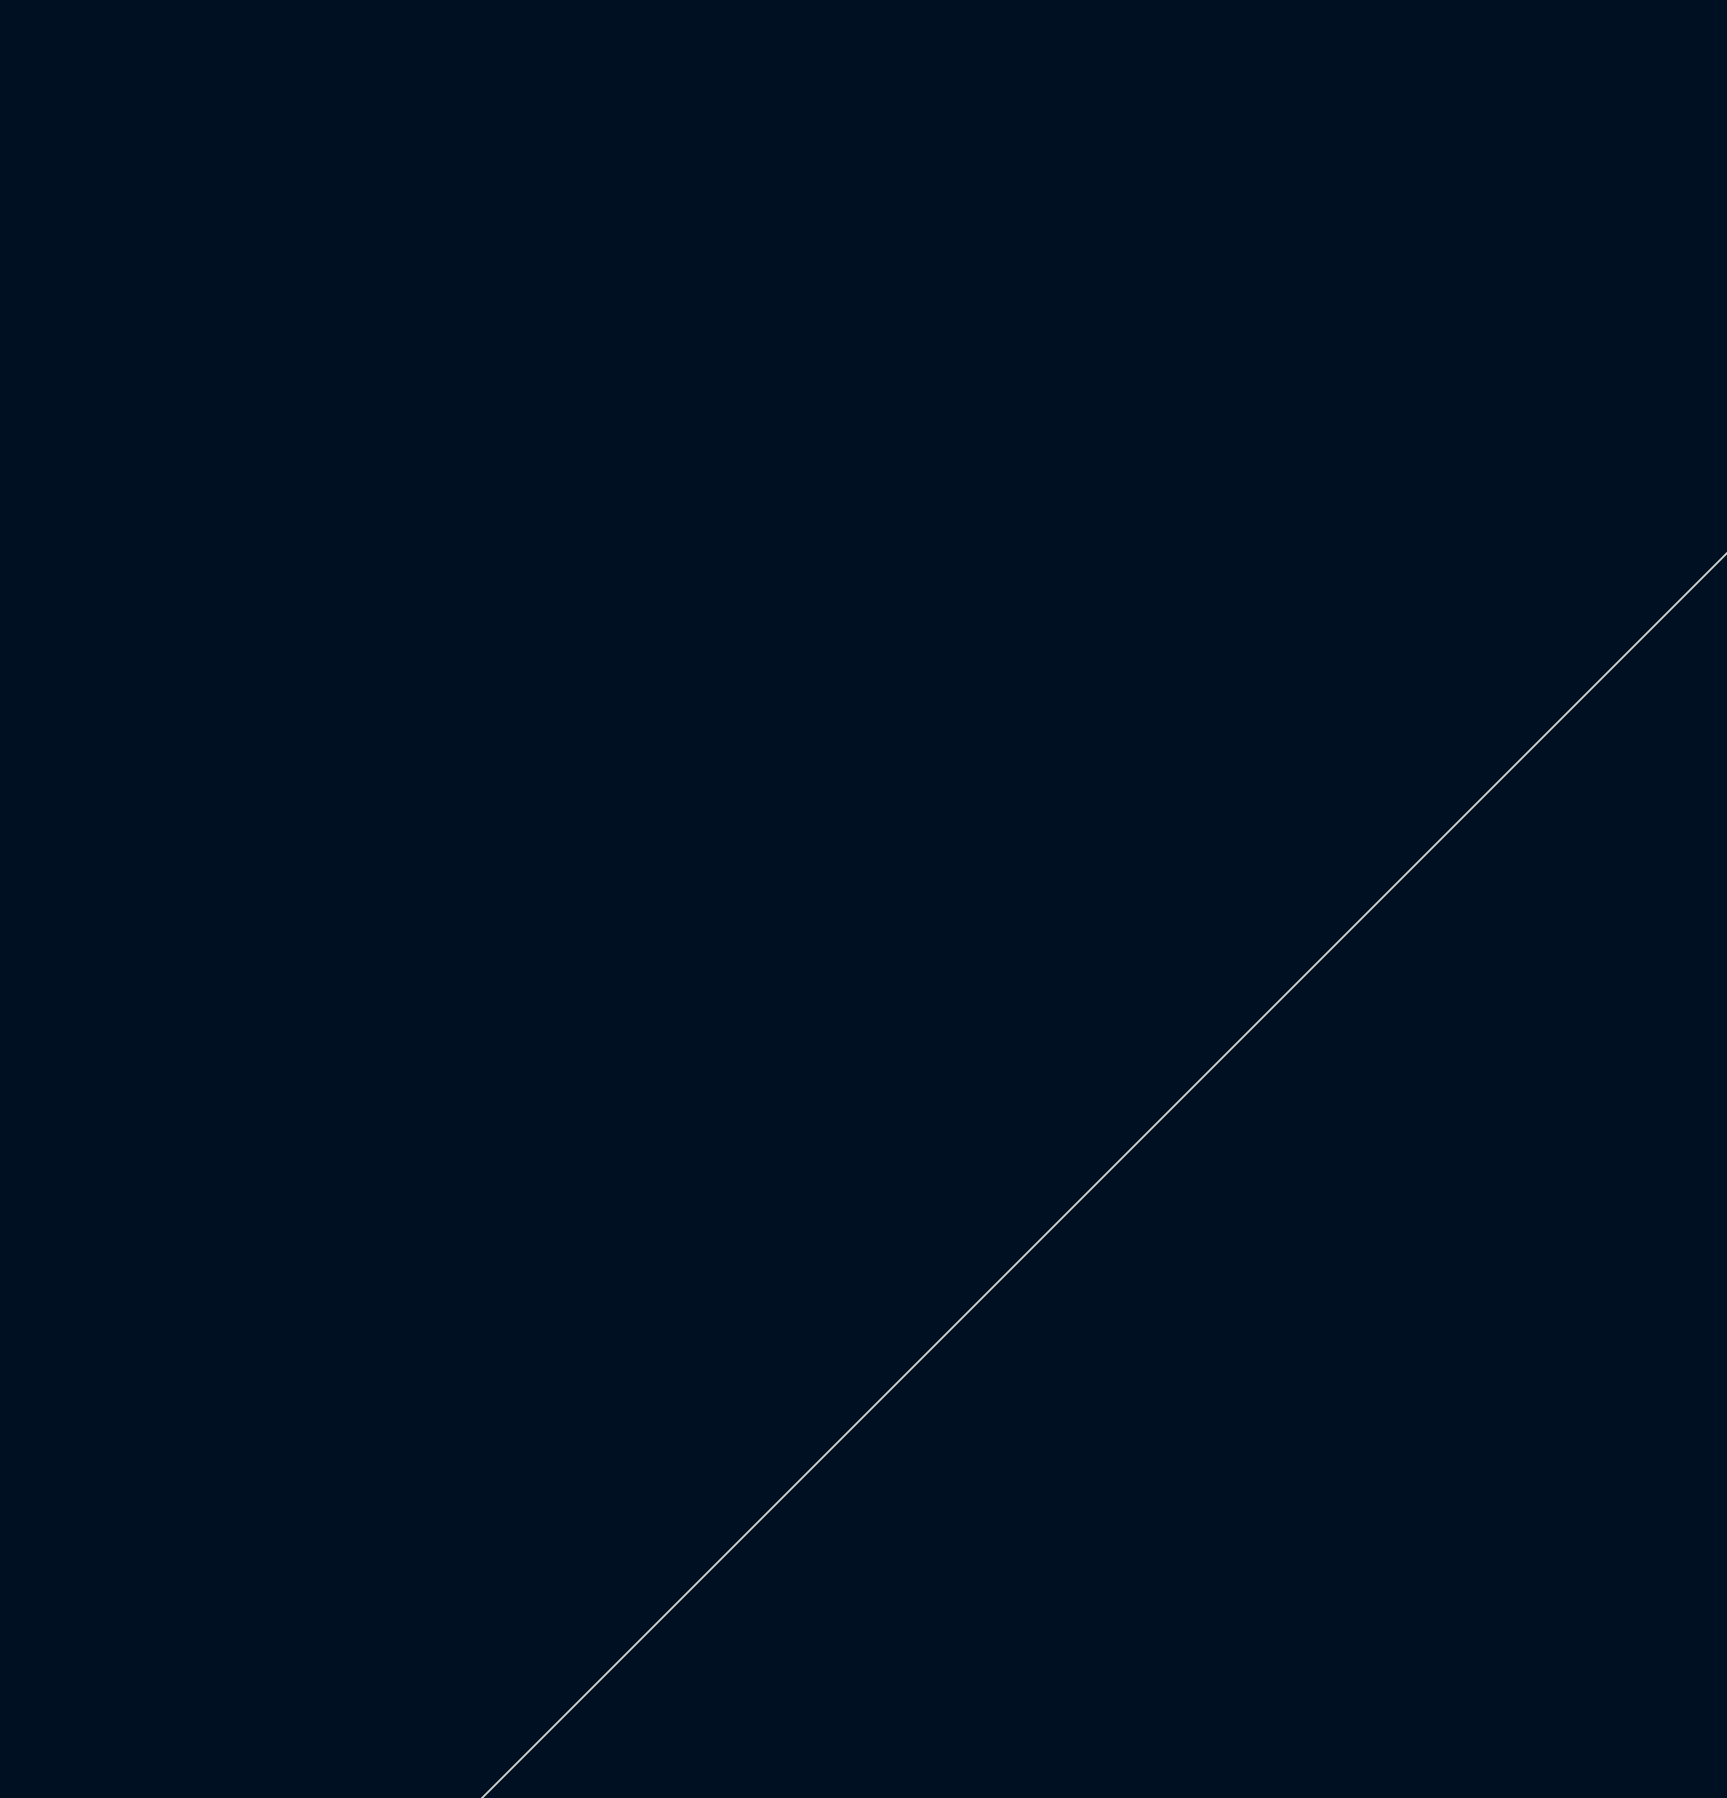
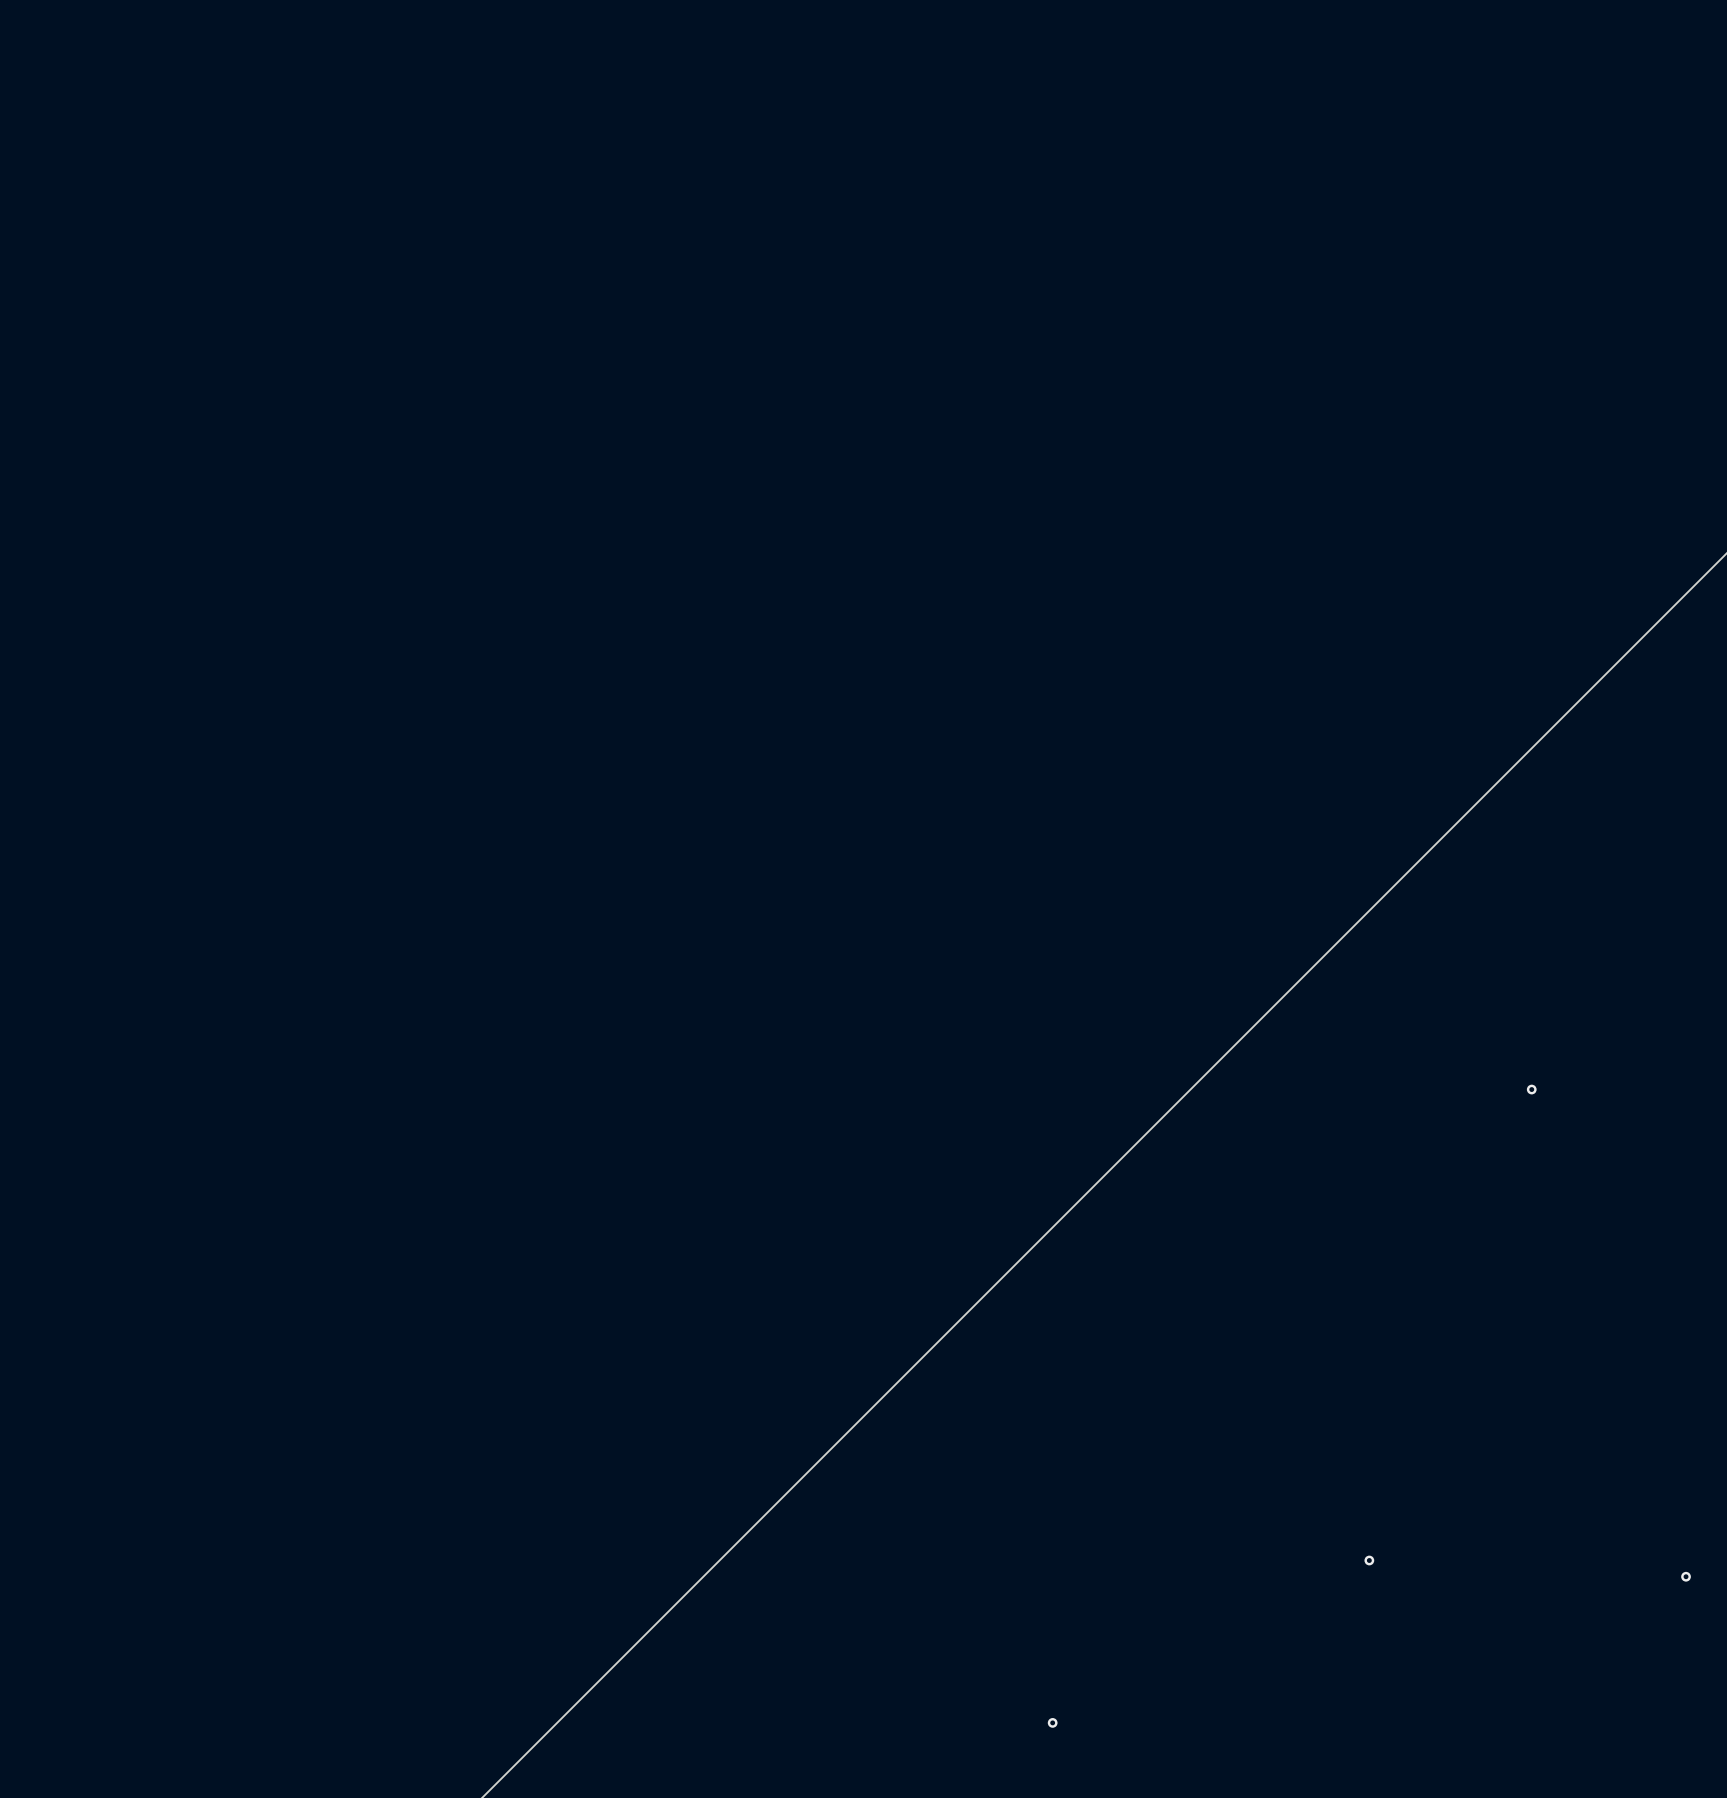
via: none -> (1531, 1089)
via: none -> (1369, 1560)
via: none -> (1686, 1576)
via: none -> (1052, 1722)

